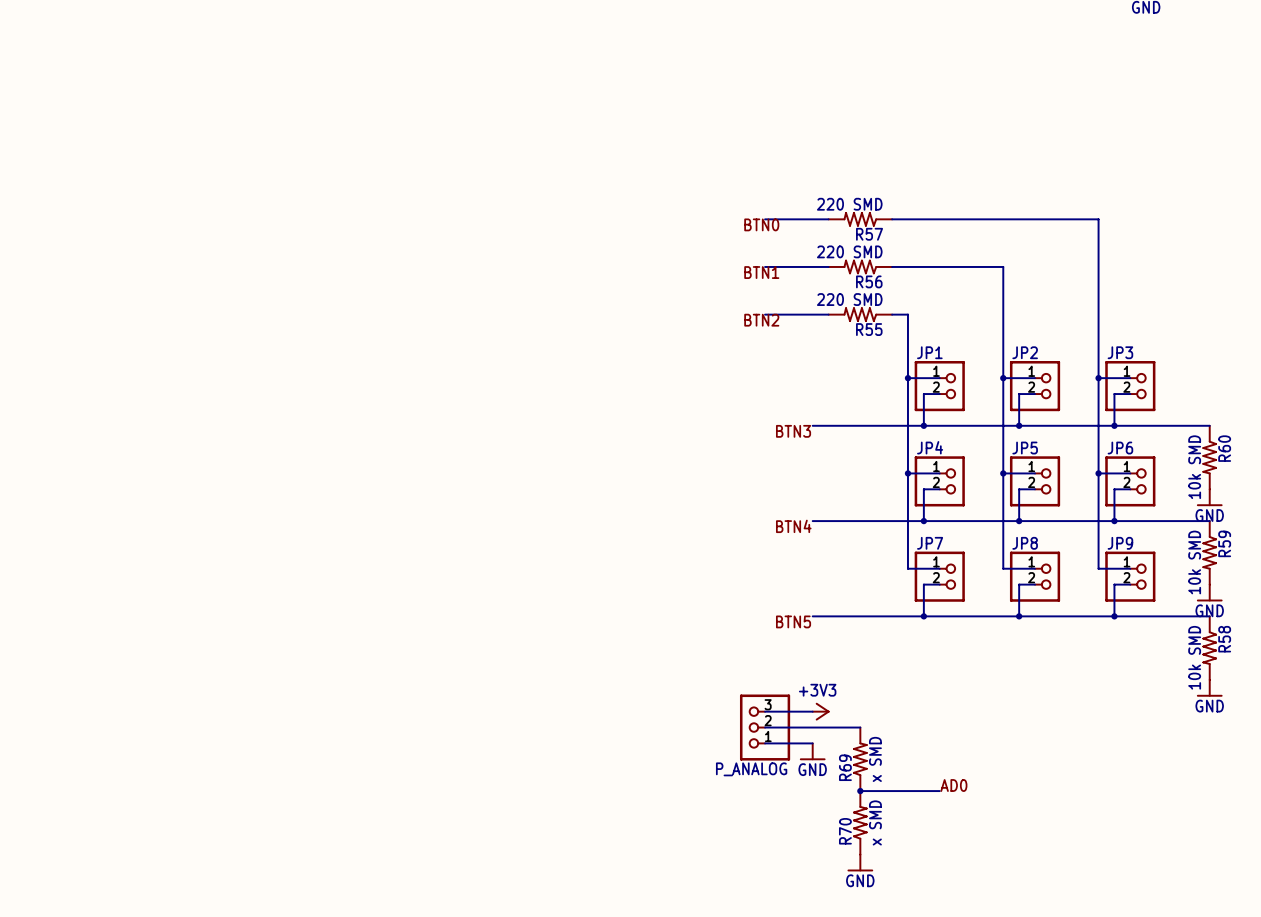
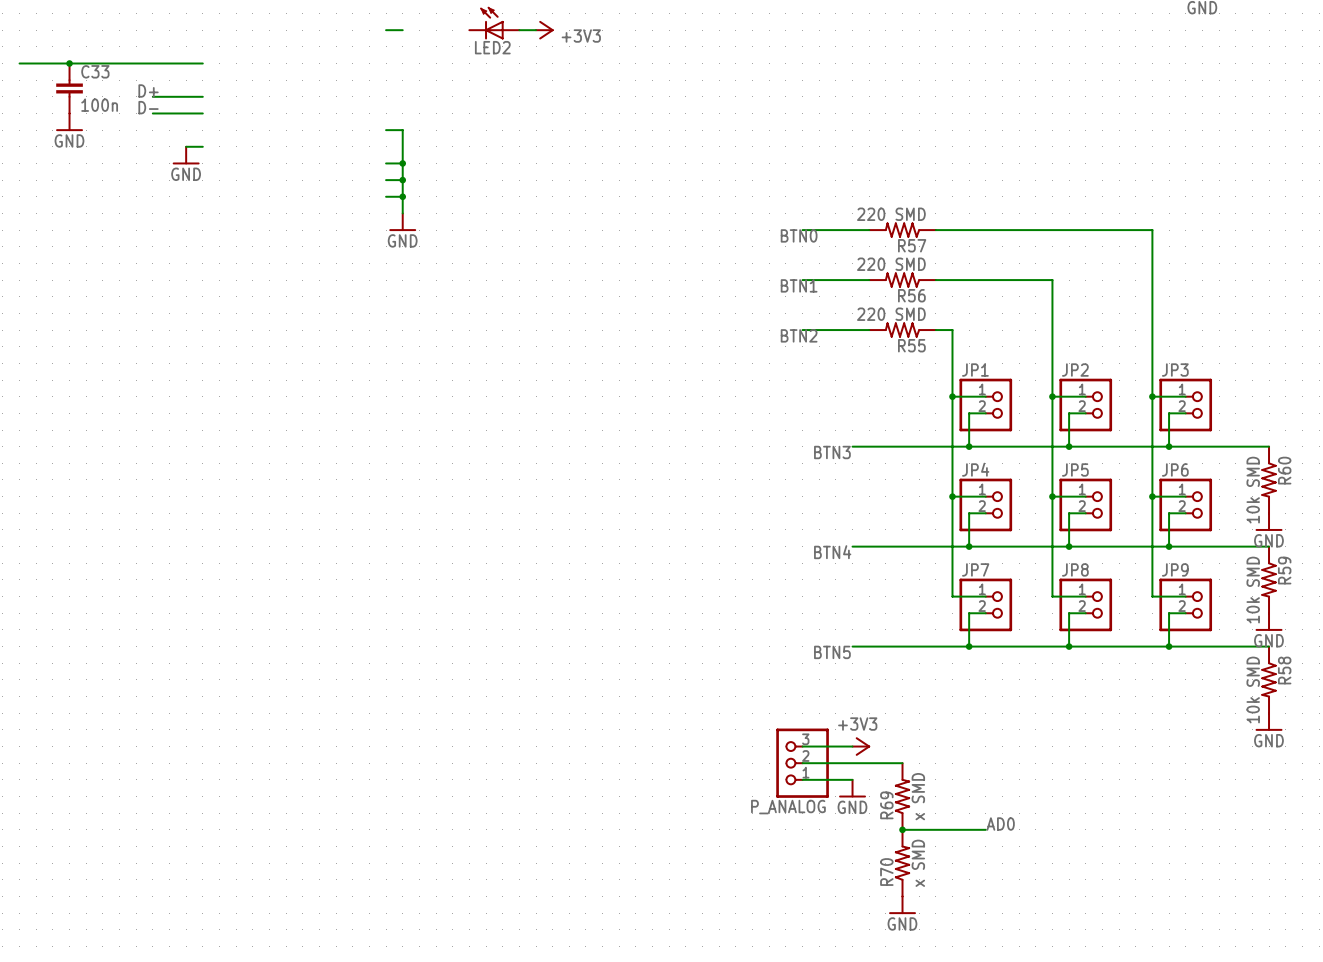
LED2: none -> (494, 23)
wire: none -> (386, 30) (402, 30)
wire: none -> (519, 30) (536, 30)
power symbol: none -> +3V3 (544, 30)
wire: none -> (19, 63) (202, 63)
junction: none -> (69, 63)
C33: none -> 100n (69, 88)
label: none -> D+ (148, 90)
wire: none -> (152, 96) (202, 96)
label: none -> D- (148, 107)
wire: none -> (152, 113) (202, 113)
power symbol: none -> GND (69, 122)
wire: none -> (386, 130) (402, 130) (402, 213)
wire: none -> (186, 146) (202, 146)
power symbol: none -> GND (186, 155)
wire: none -> (386, 163) (402, 163)
junction: none -> (402, 163)
wire: none -> (386, 180) (402, 180)
junction: none -> (402, 180)
wire: none -> (386, 196) (402, 196)
junction: none -> (402, 196)
power symbol: none -> GND (402, 222)

